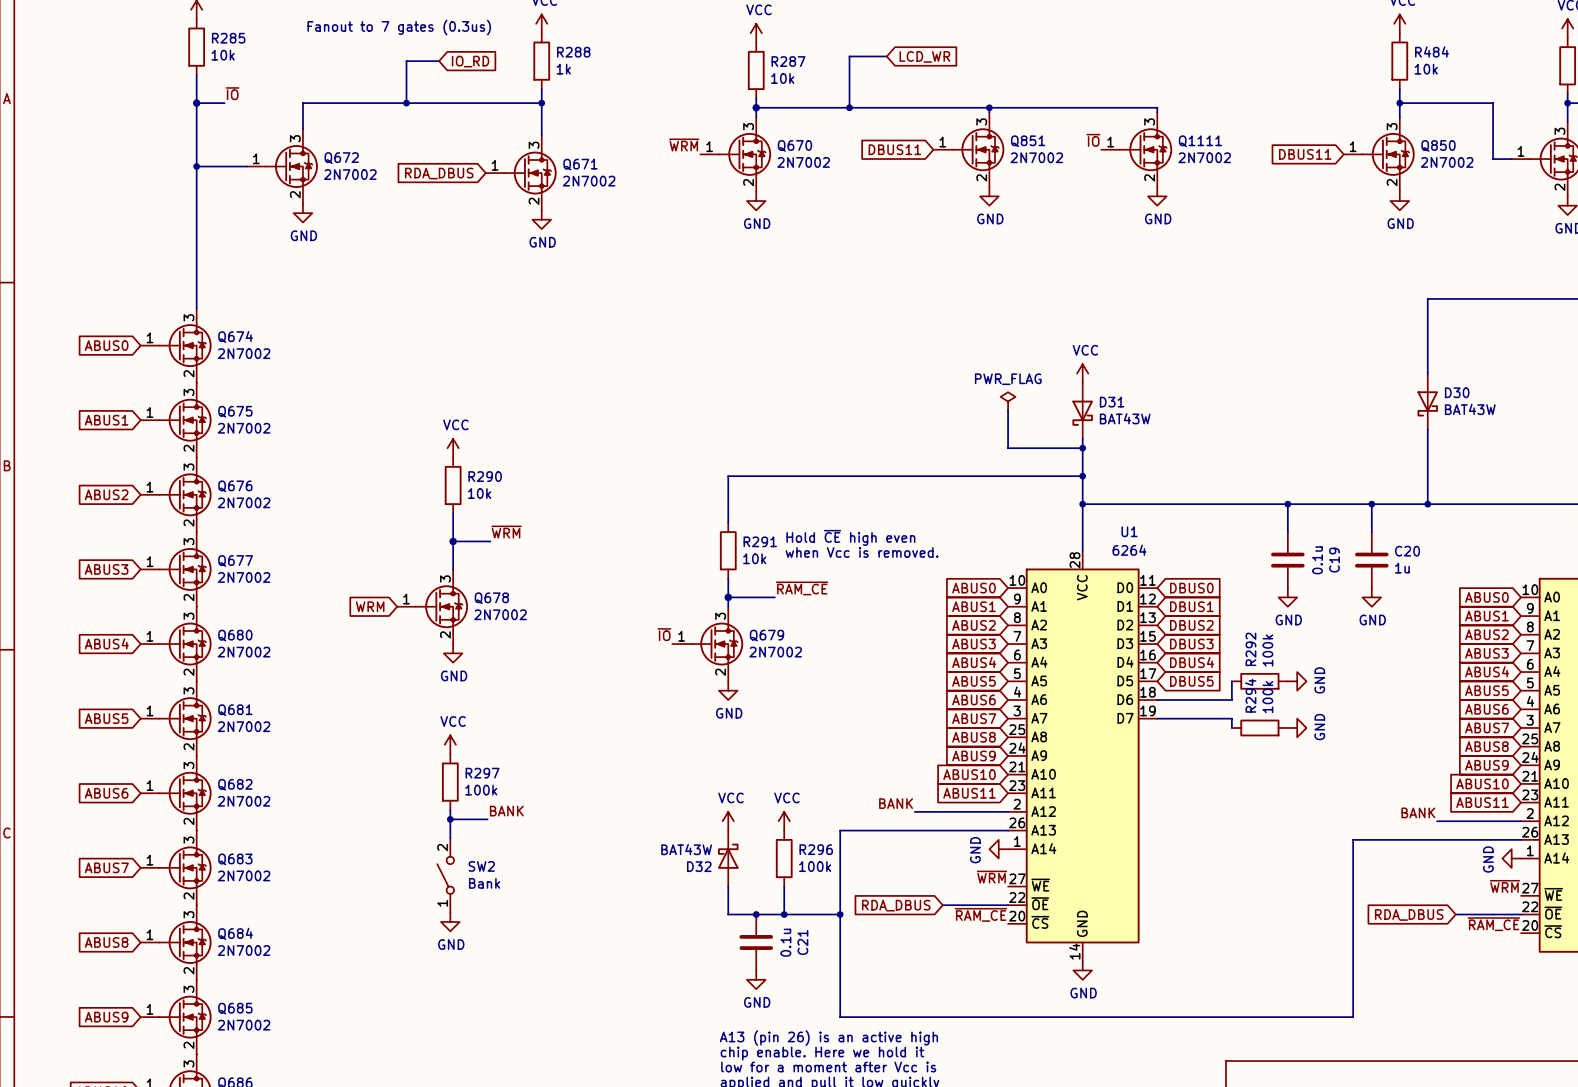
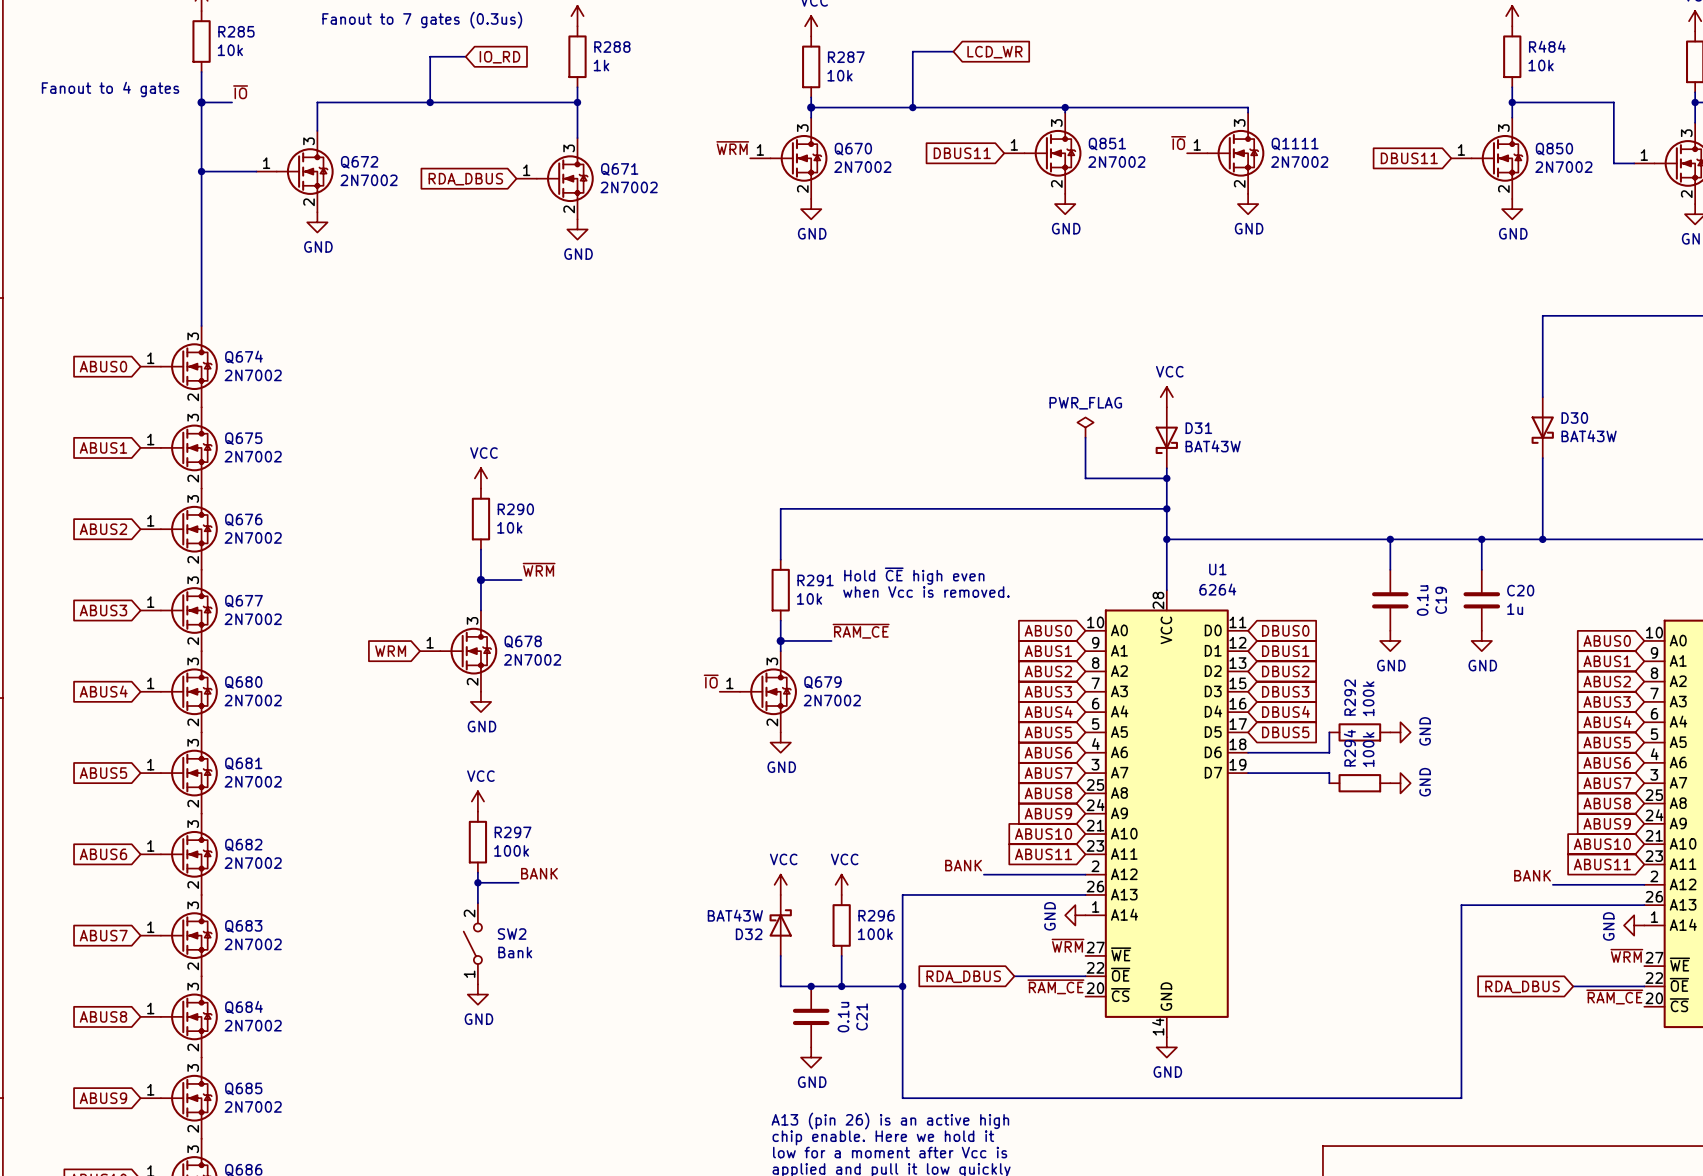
text: none -> Fanout to 4 gates (110, 89)

